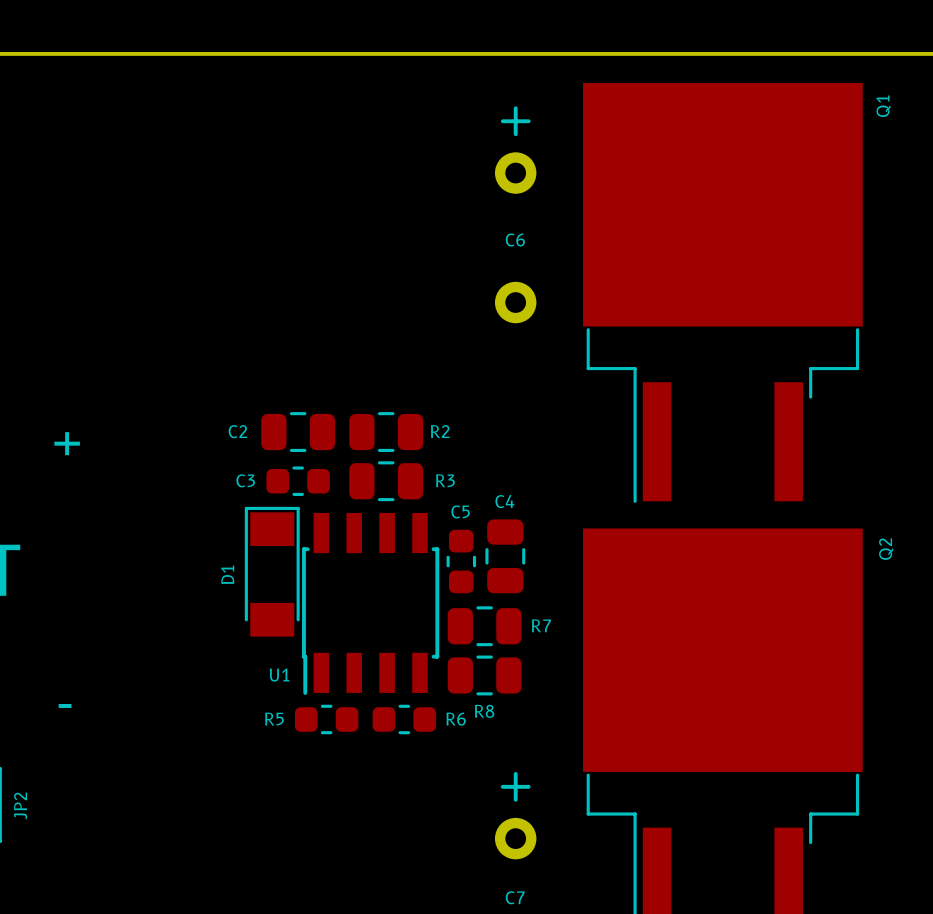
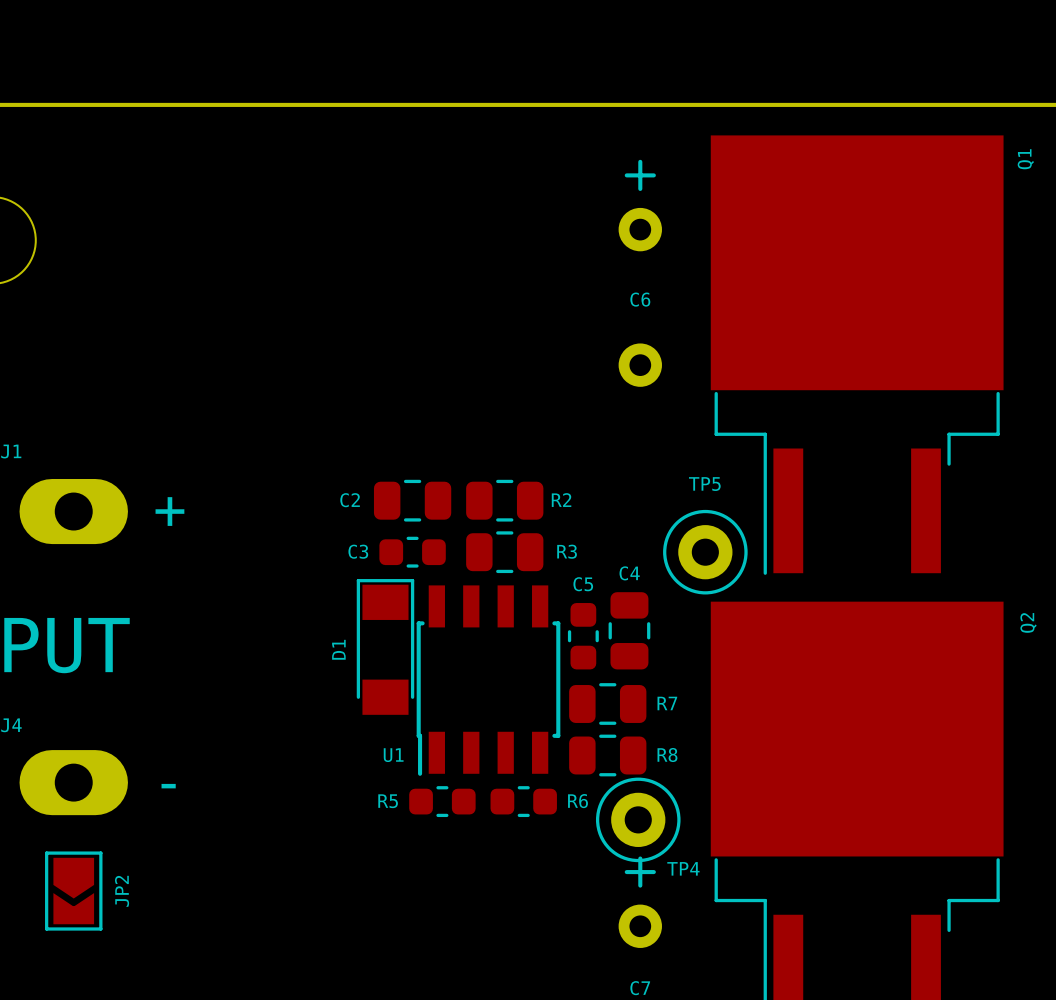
TP5: none -> (705, 552)
R8 name position: R8 (484, 711) -> R8 (667, 755)
TP4: none -> (638, 819)

